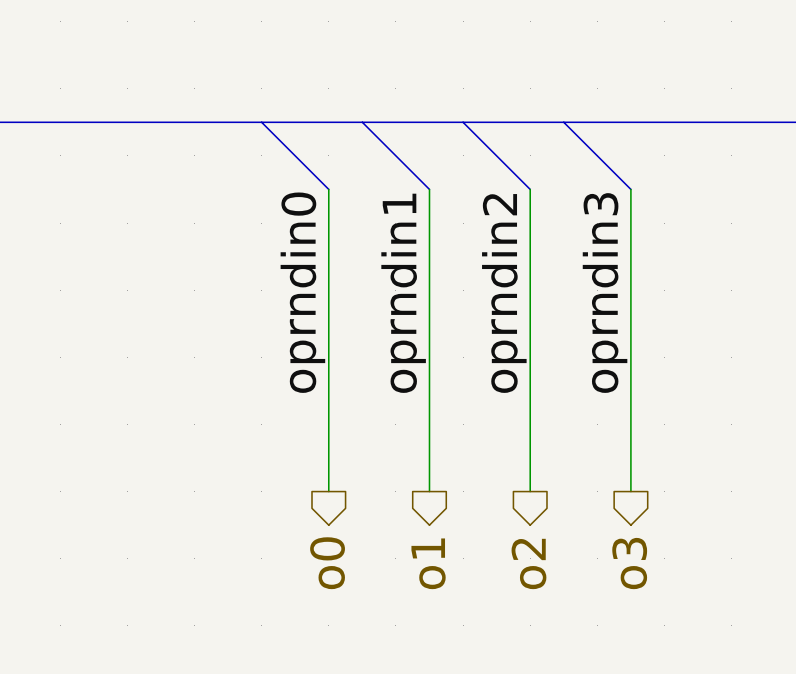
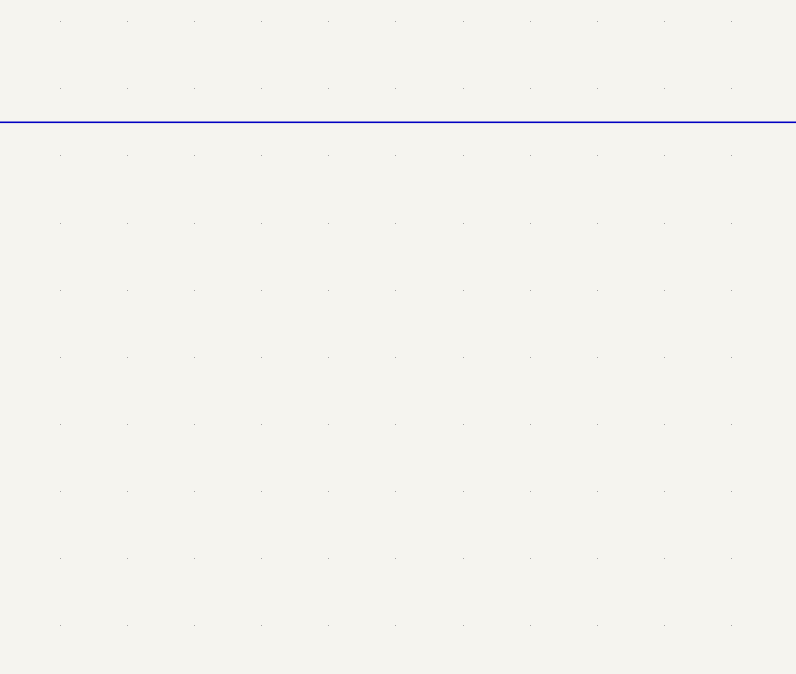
bus: (261, 122) (328, 189) -> none
bus: (362, 122) (429, 189) -> none
bus: (463, 122) (530, 189) -> none
bus: (563, 122) (630, 189) -> none
wire: (328, 189) (328, 491) -> none
wire: (429, 189) (429, 491) -> none
wire: (530, 189) (530, 491) -> none
wire: (630, 189) (630, 491) -> none
label: oprndin0 (302, 292) -> none
label: oprndin1 (403, 293) -> none
label: oprndin2 (504, 293) -> none
label: oprndin3 (605, 293) -> none
hierarchical label: o0 (327, 563) -> none
hierarchical label: o1 (428, 563) -> none
hierarchical label: o2 (528, 563) -> none
hierarchical label: o3 (629, 563) -> none

